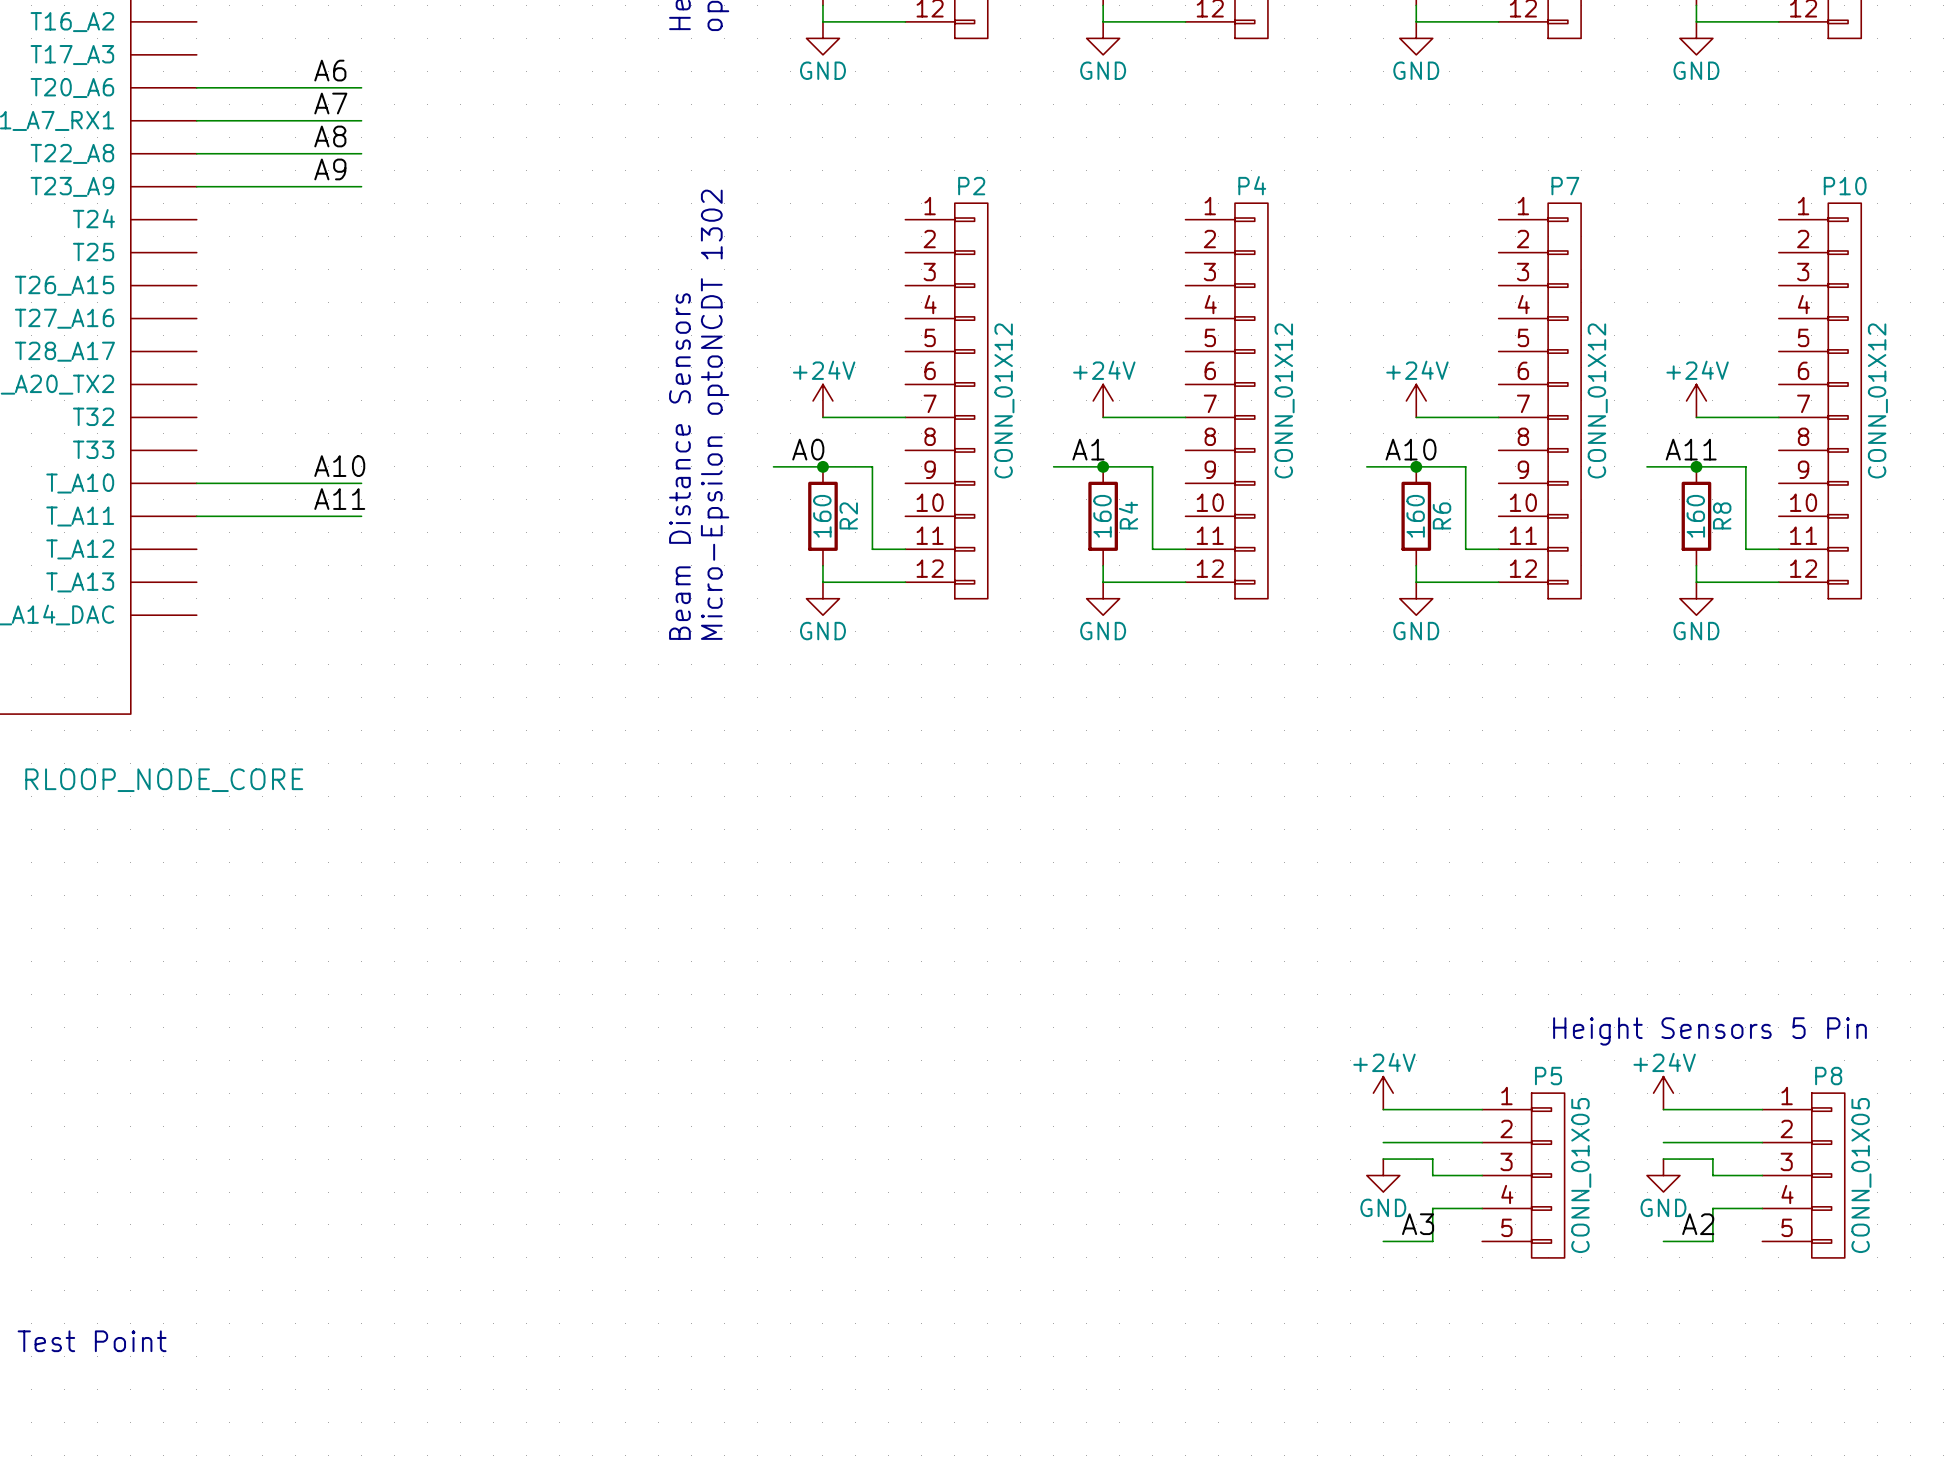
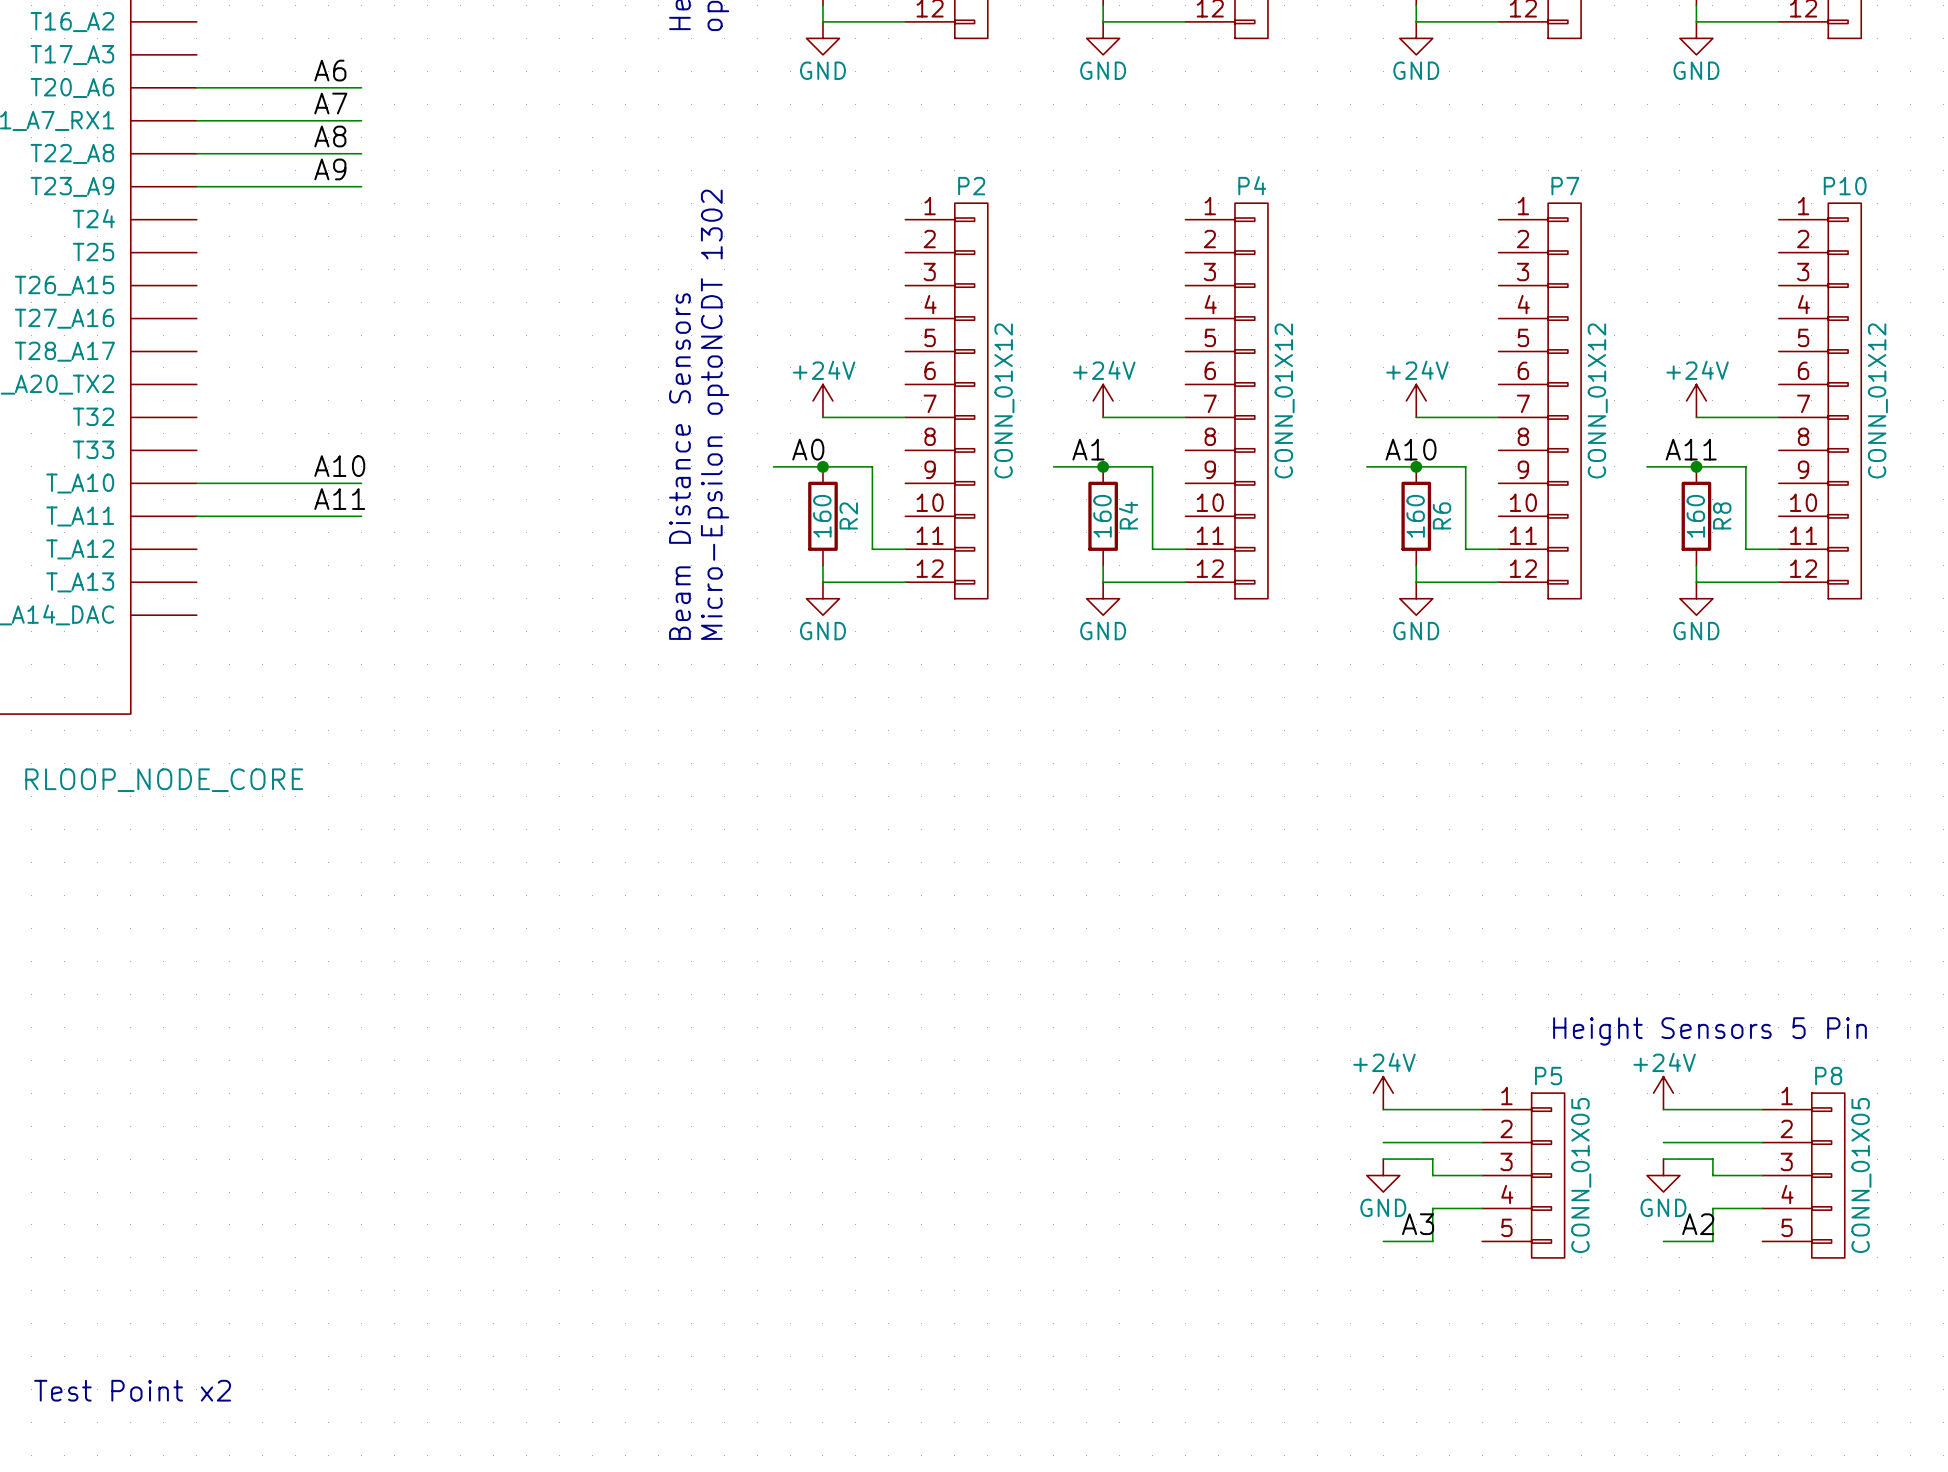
text: Test Point (92, 1341) -> none
text: none -> Test Point x2 (132, 1390)

